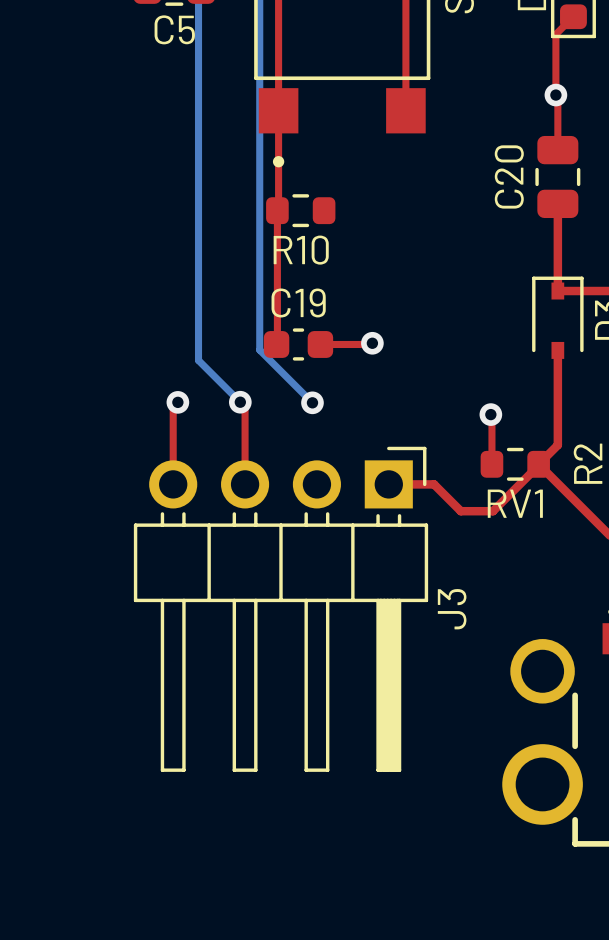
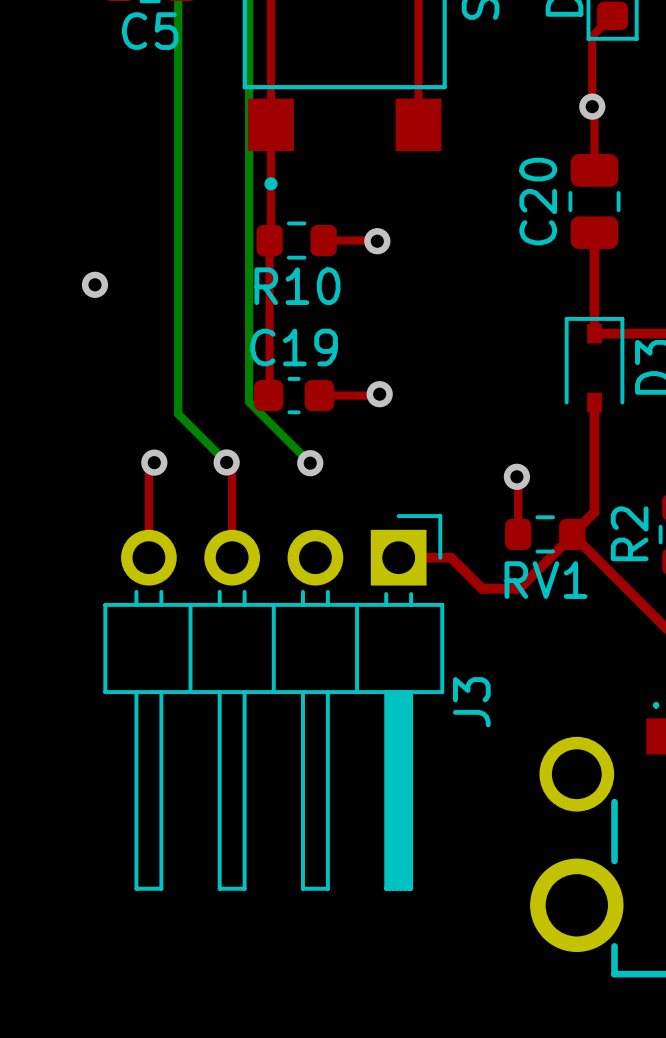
top track: none -> (323, 240) (377, 241)
via: none -> (377, 241)
via: none -> (94, 284)

